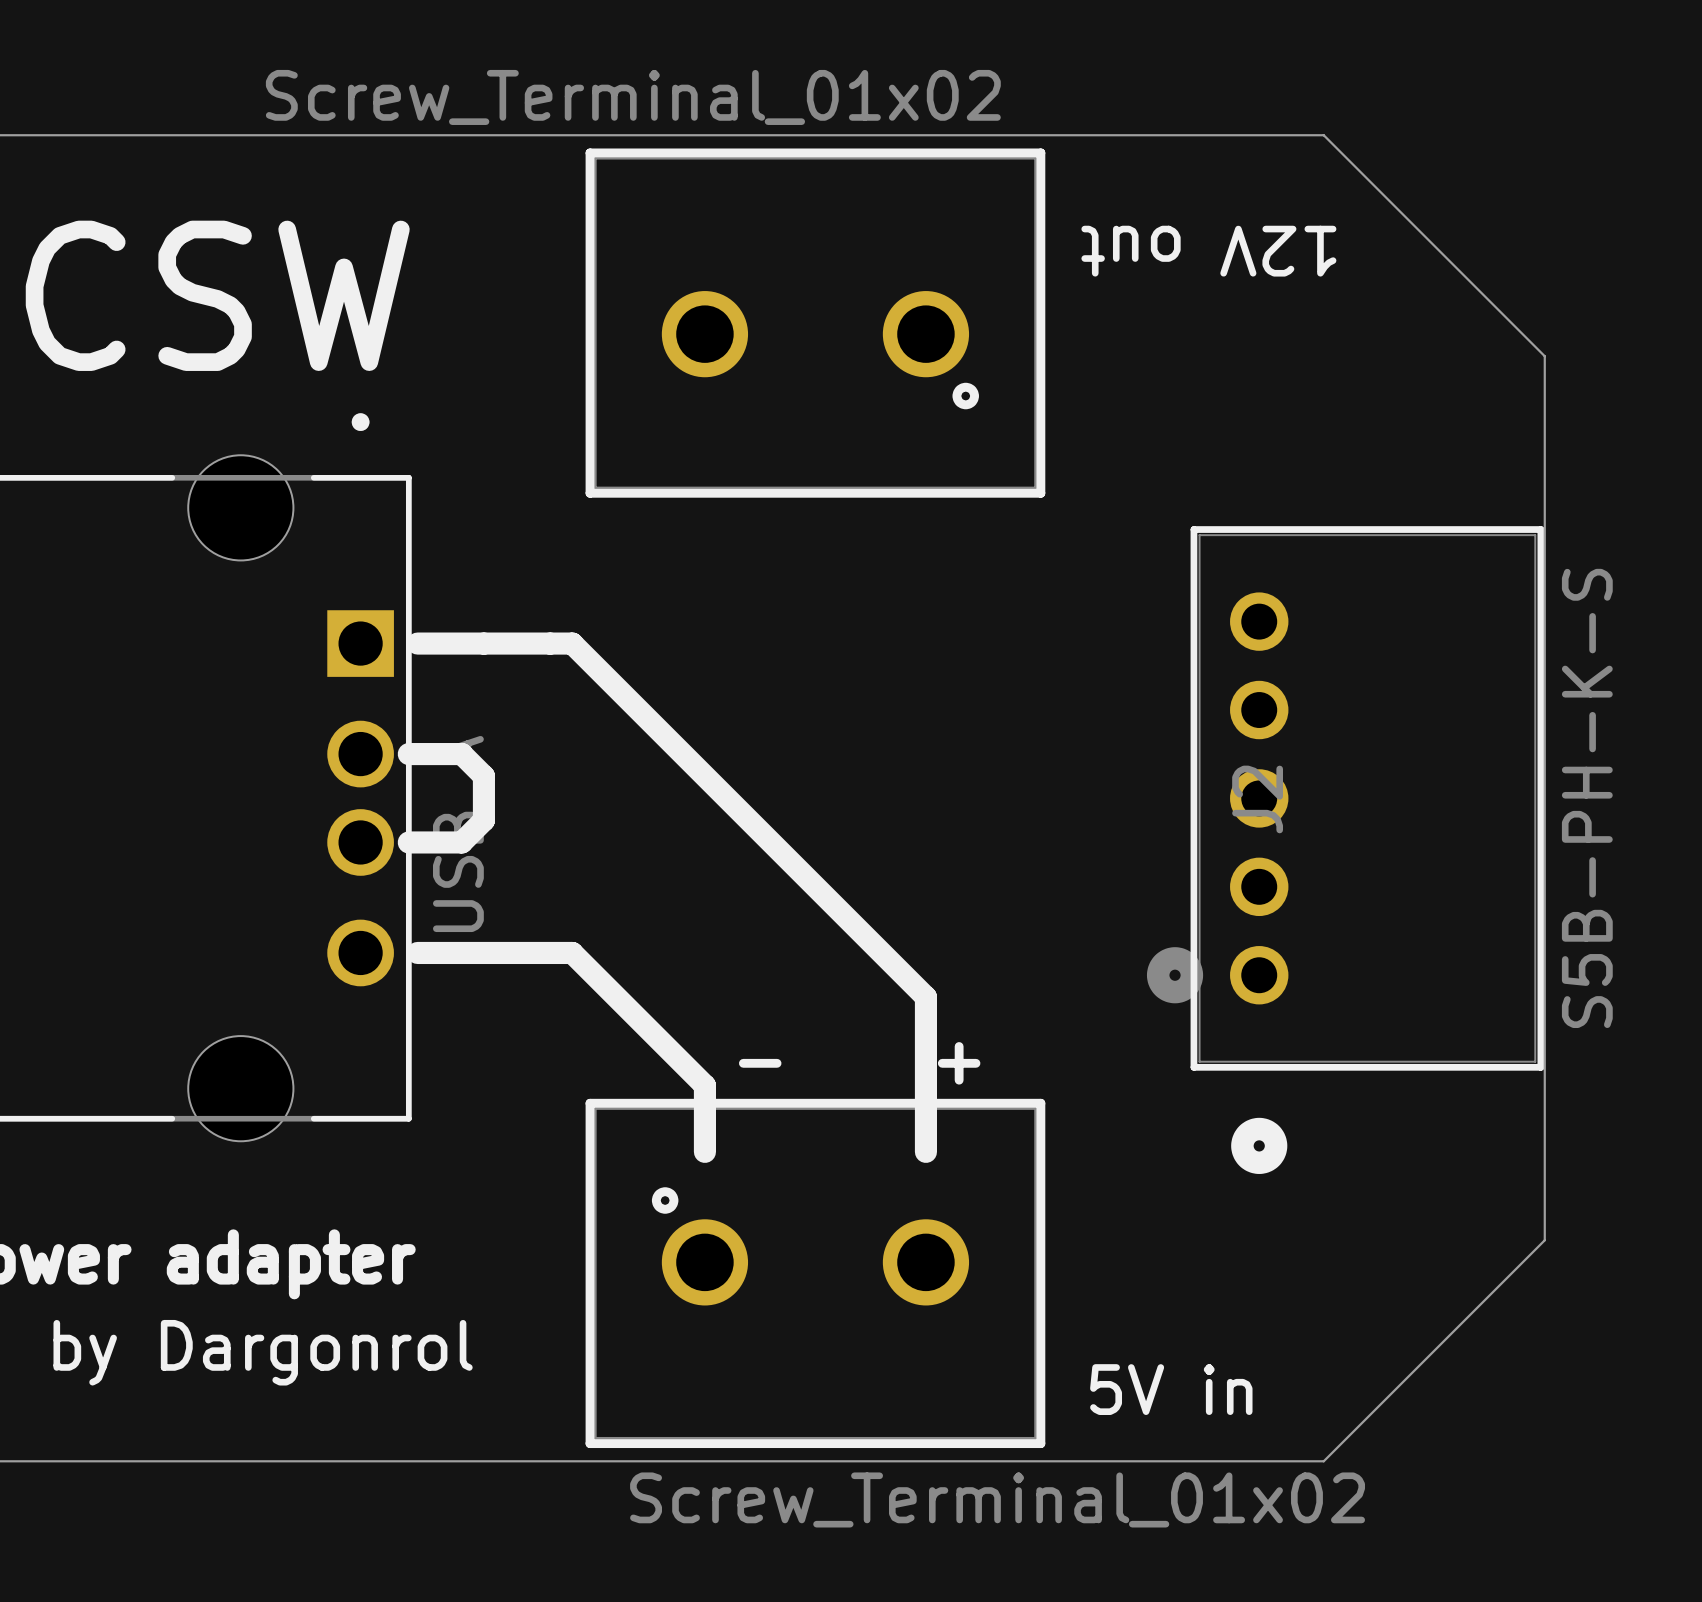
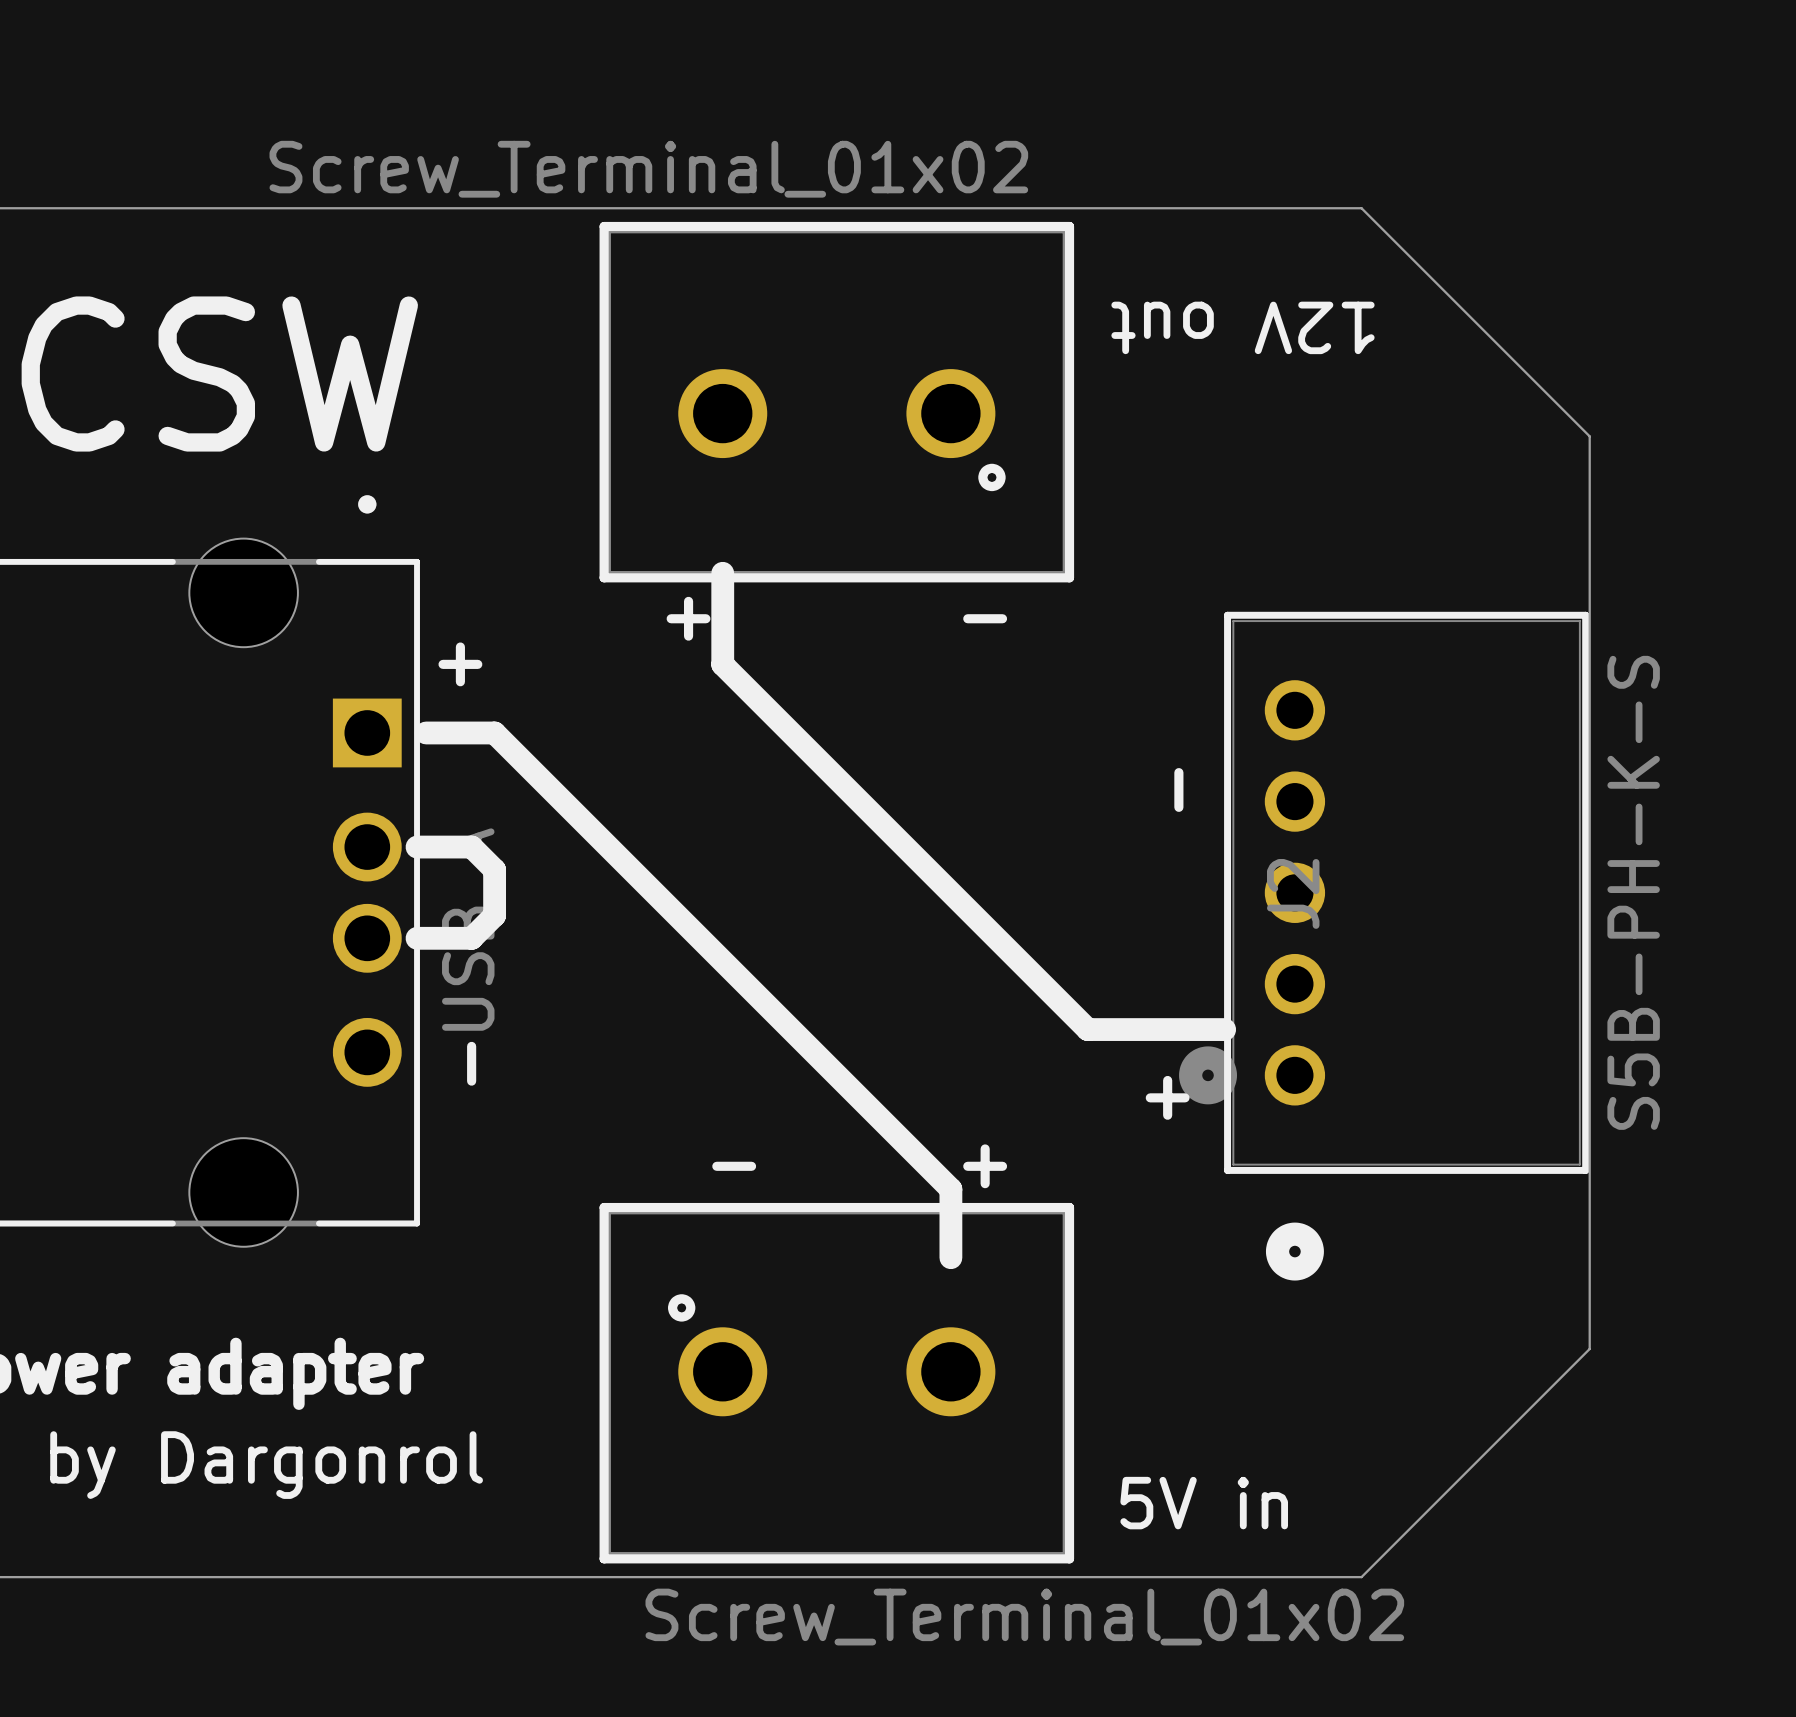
line: none -> (722, 573) (722, 664) (1087, 1029) (1224, 1029)
text: none -> + (688, 618)
text: none -> - (985, 618)
text: none -> + (460, 664)
line: (483, 643) (572, 643) (925, 997) (925, 1085) -> (494, 732) (950, 1189)
text: none -> - (1178, 789)
line: (417, 952) (572, 952) (704, 1085) (704, 1151) -> none
text: none -> - (471, 1063)
text: none -> + (1167, 1097)
text position: - (760, 1063) -> - (734, 1166)

